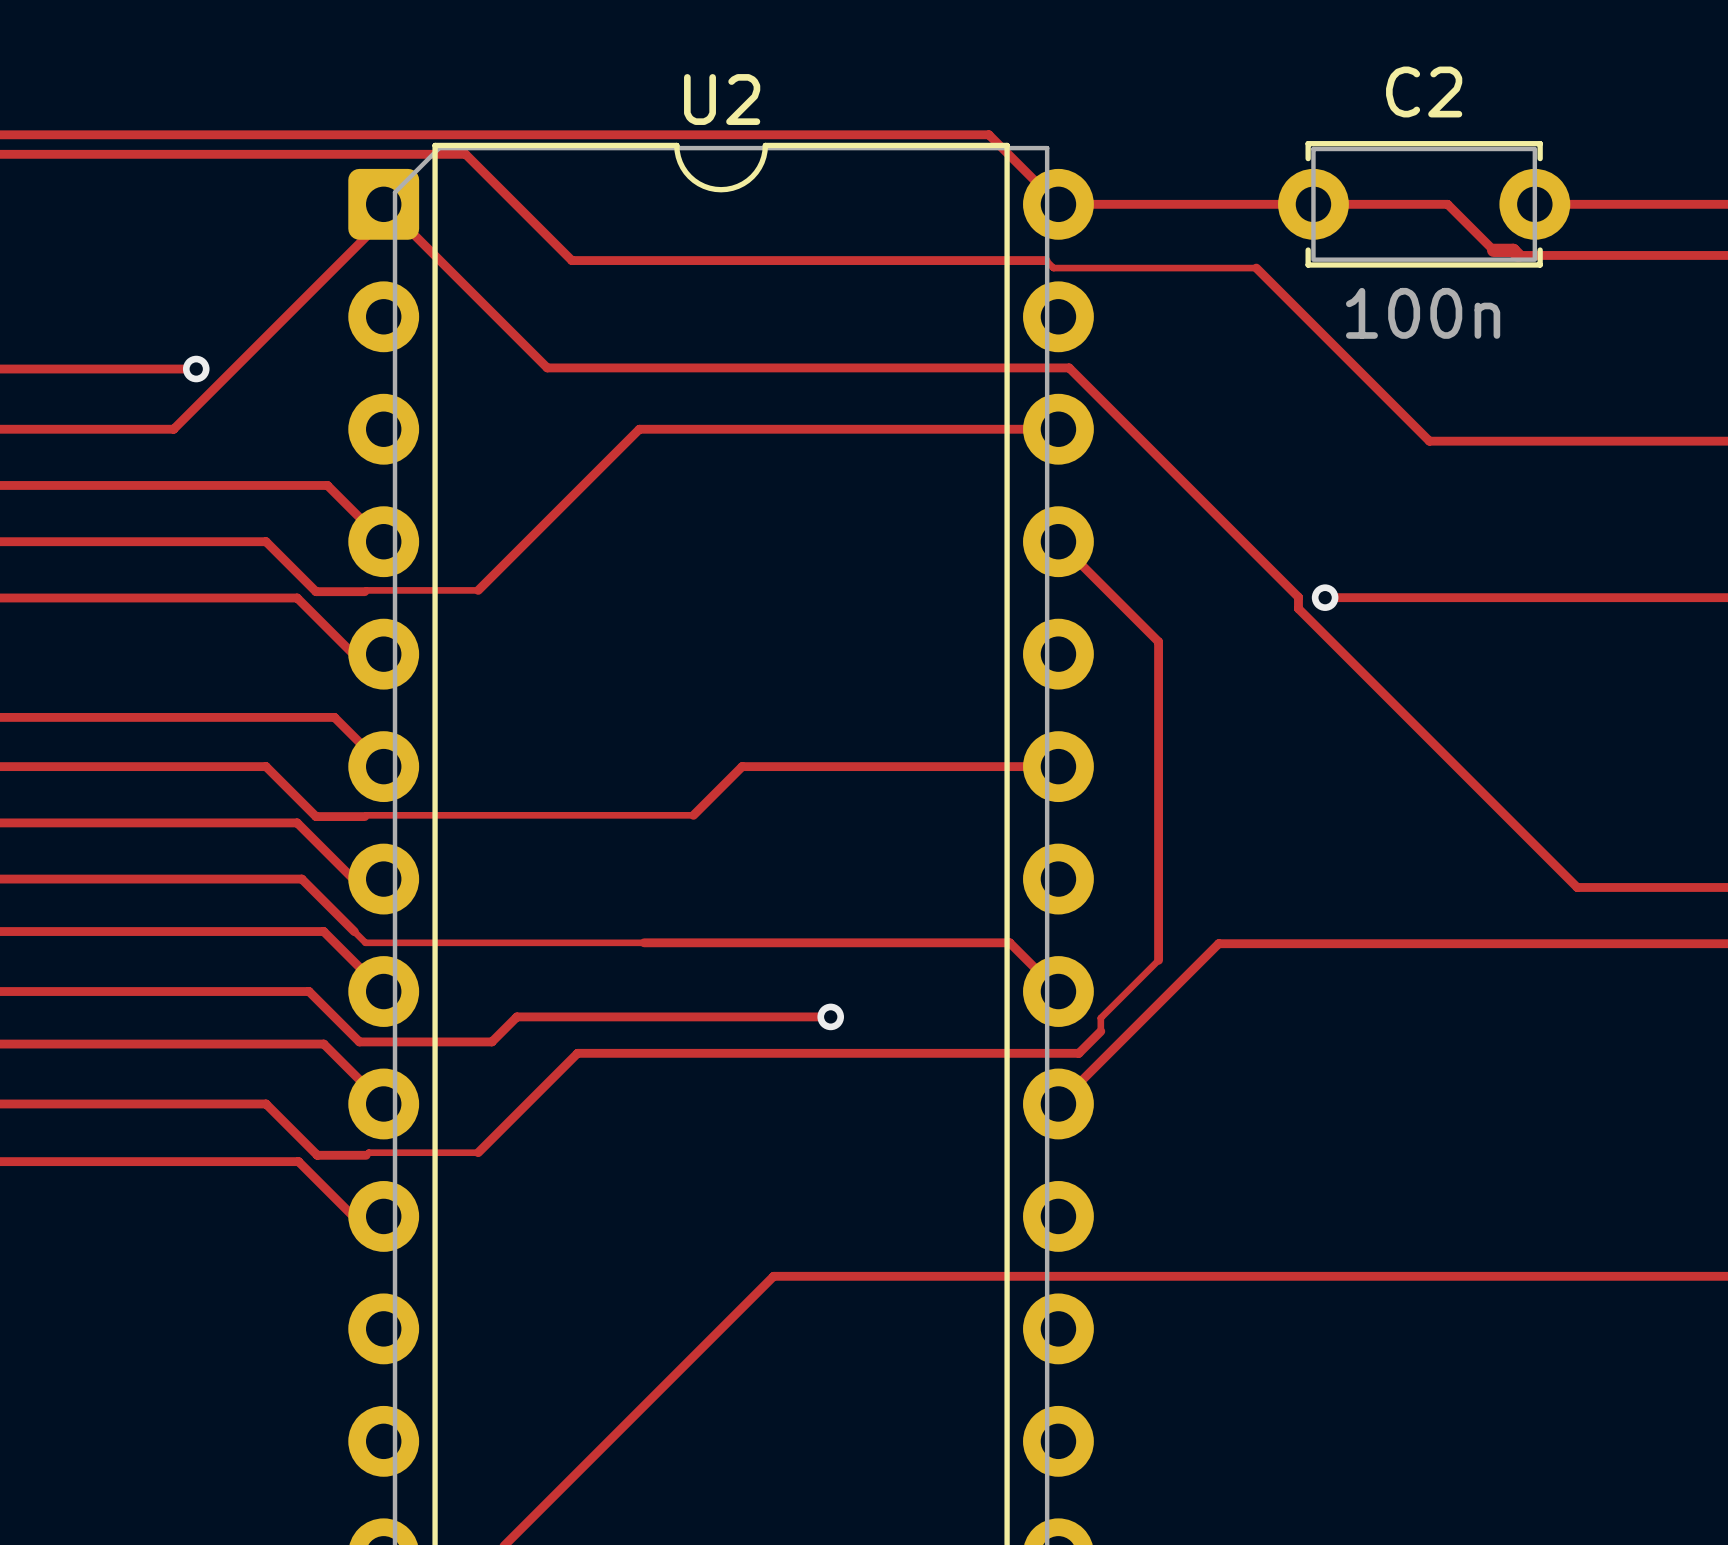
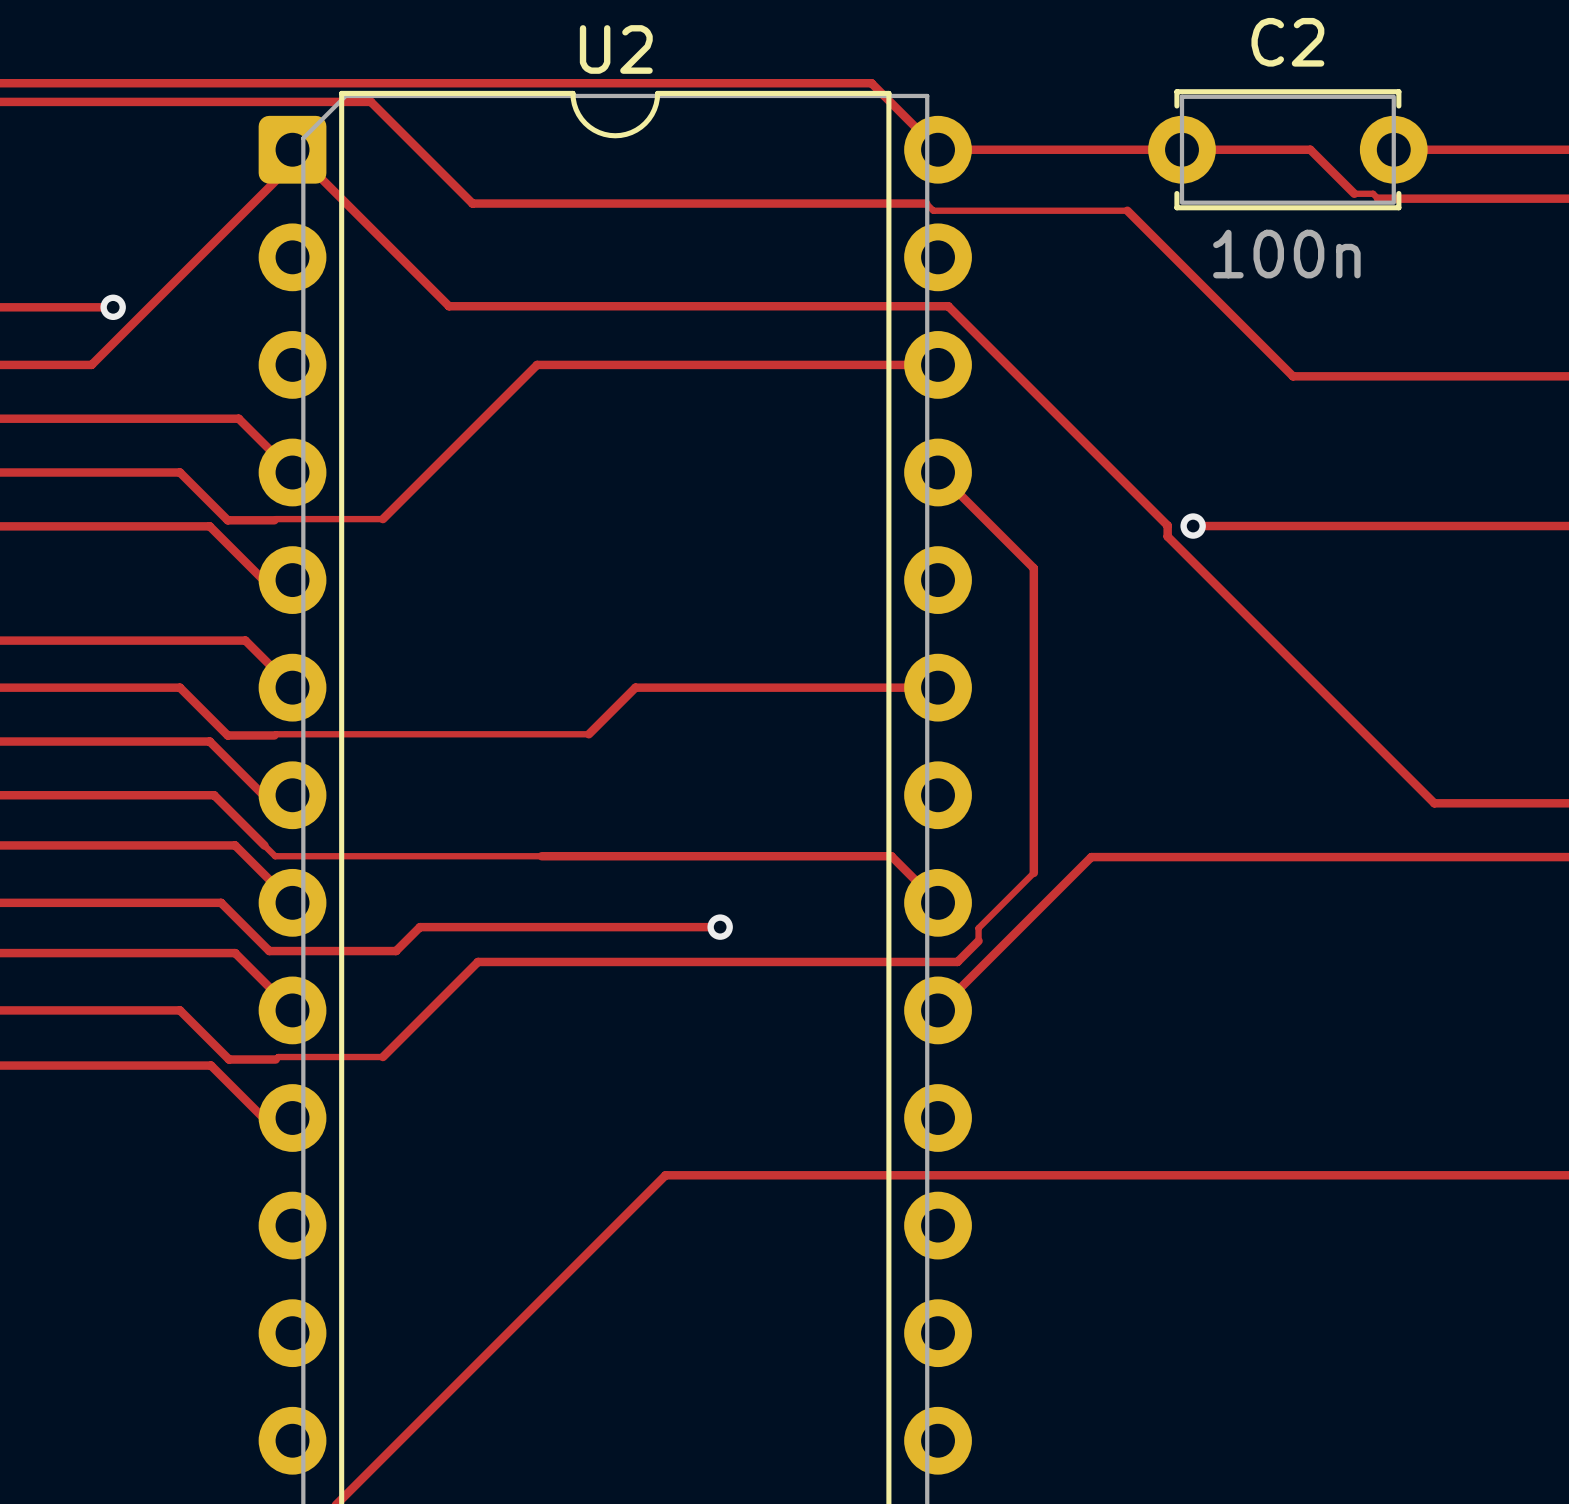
track width: thick (1493, 250) (1513, 250) (1518, 255) -> thin (1354, 193) (1373, 193) (1378, 198)

